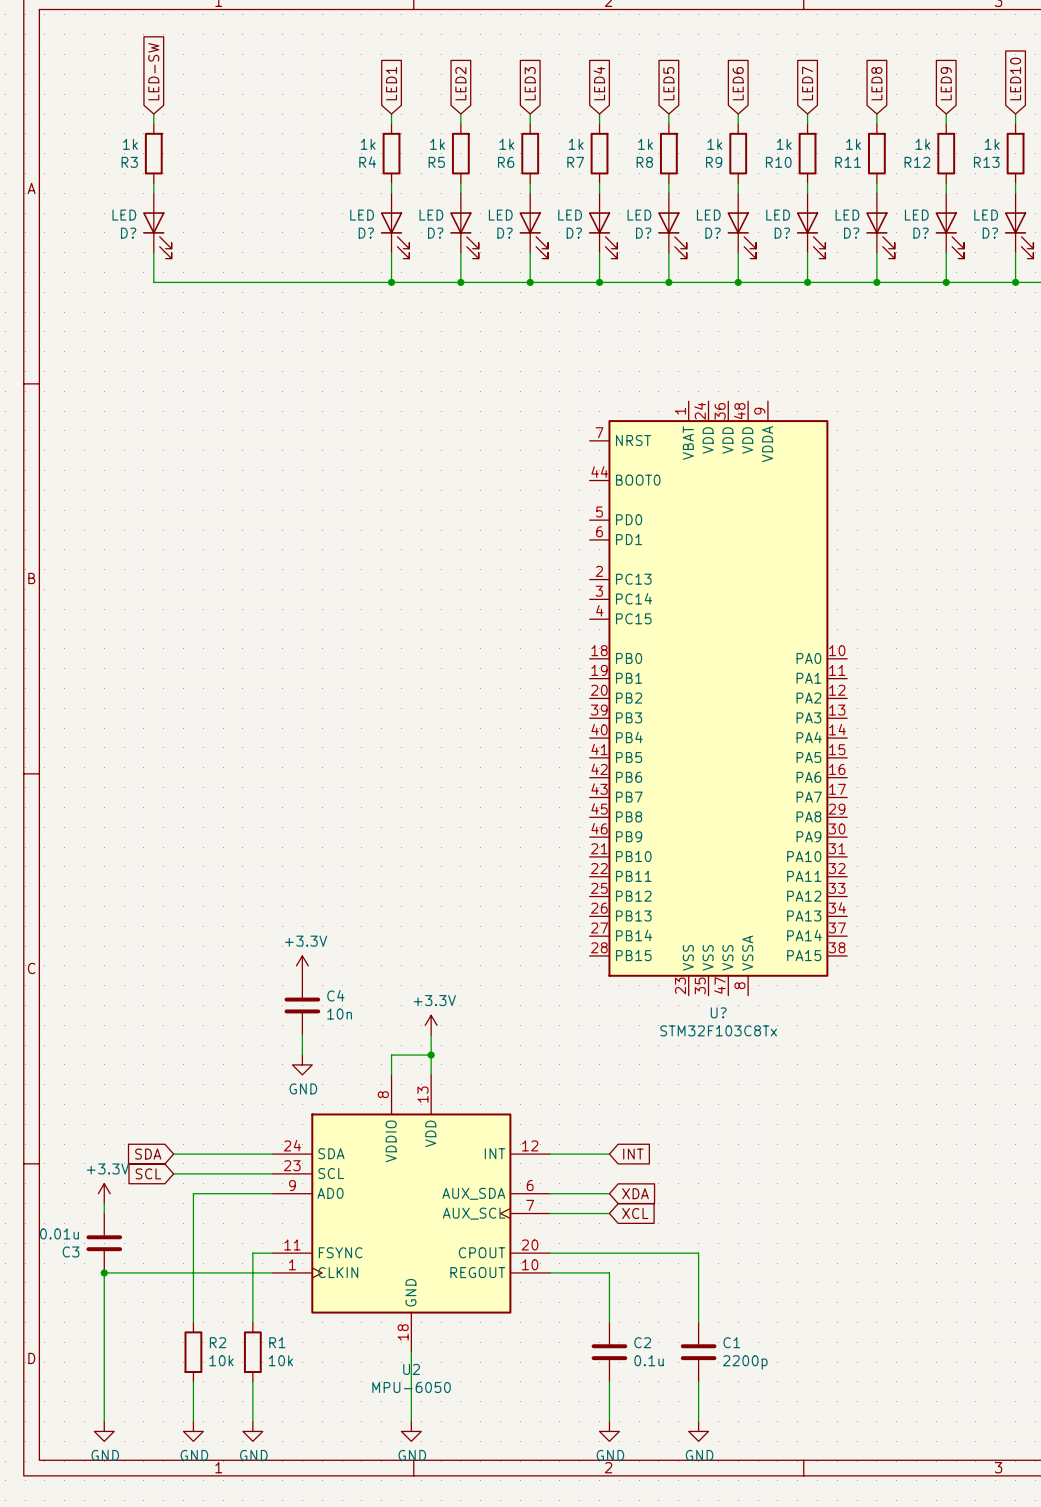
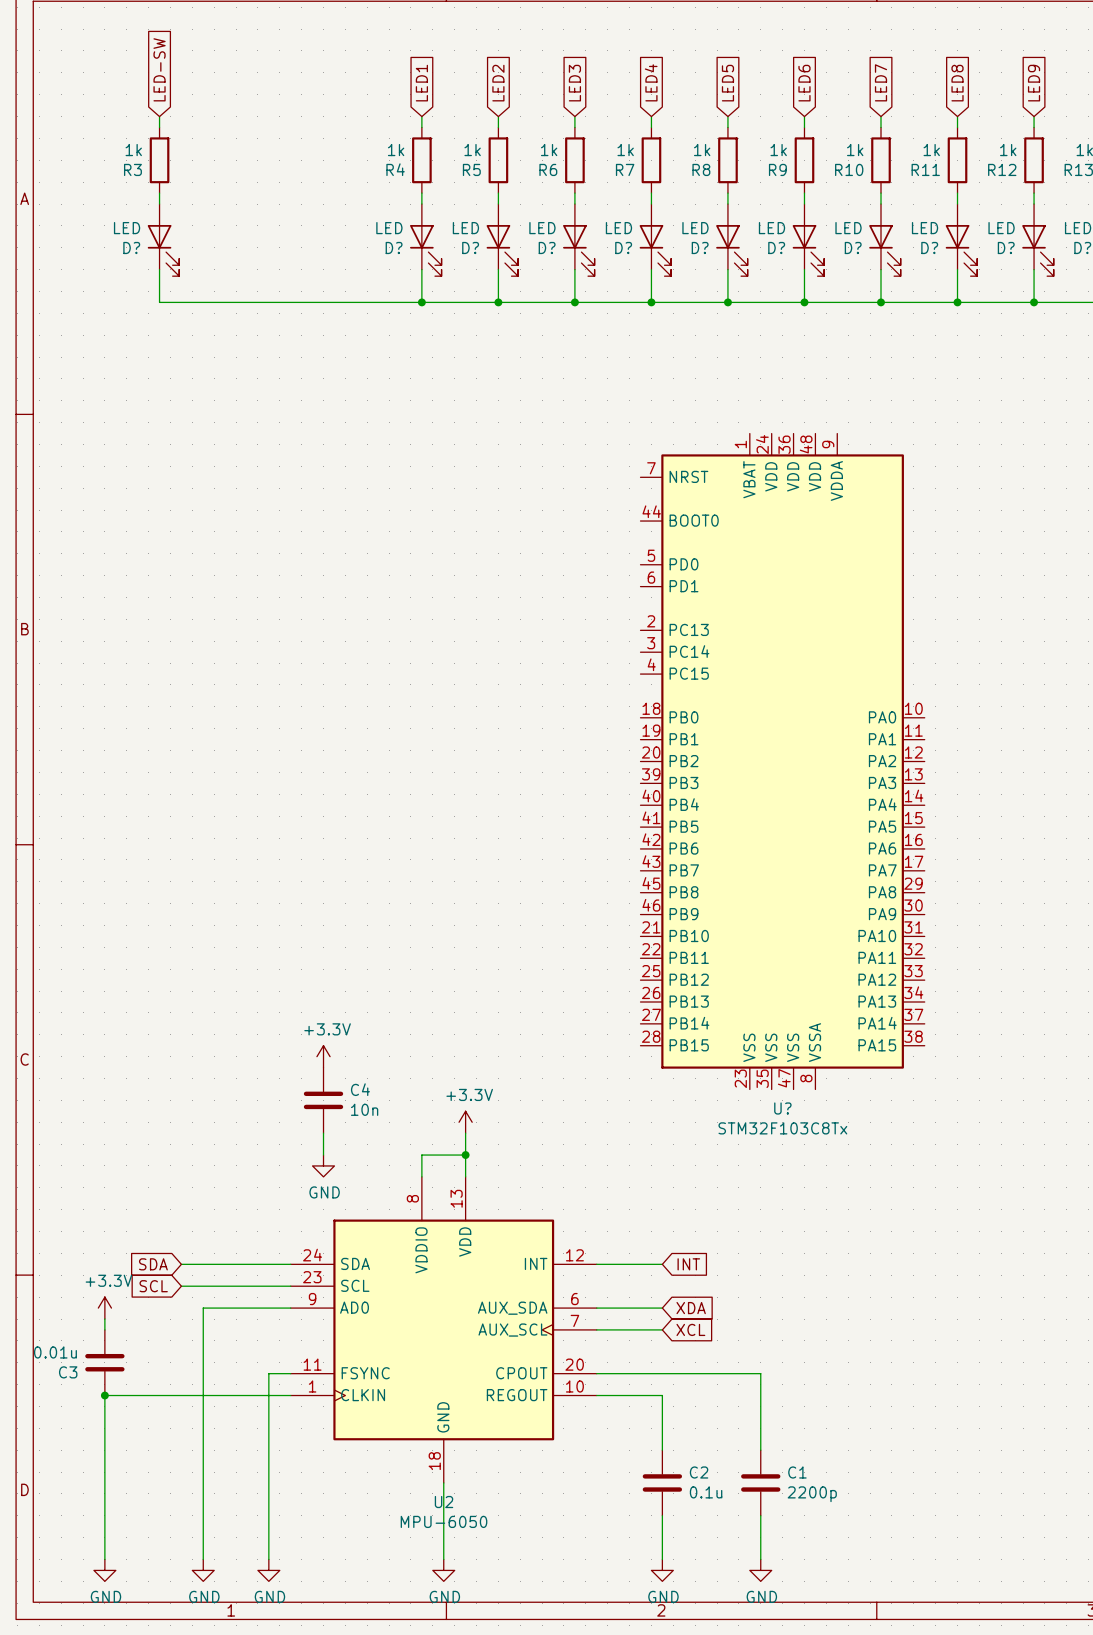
wire: none -> (203, 1450) (203, 1515)
wire: none -> (268, 1450) (268, 1515)
R2: 10k (193, 1352) -> none
R1: 10k (252, 1352) -> none

